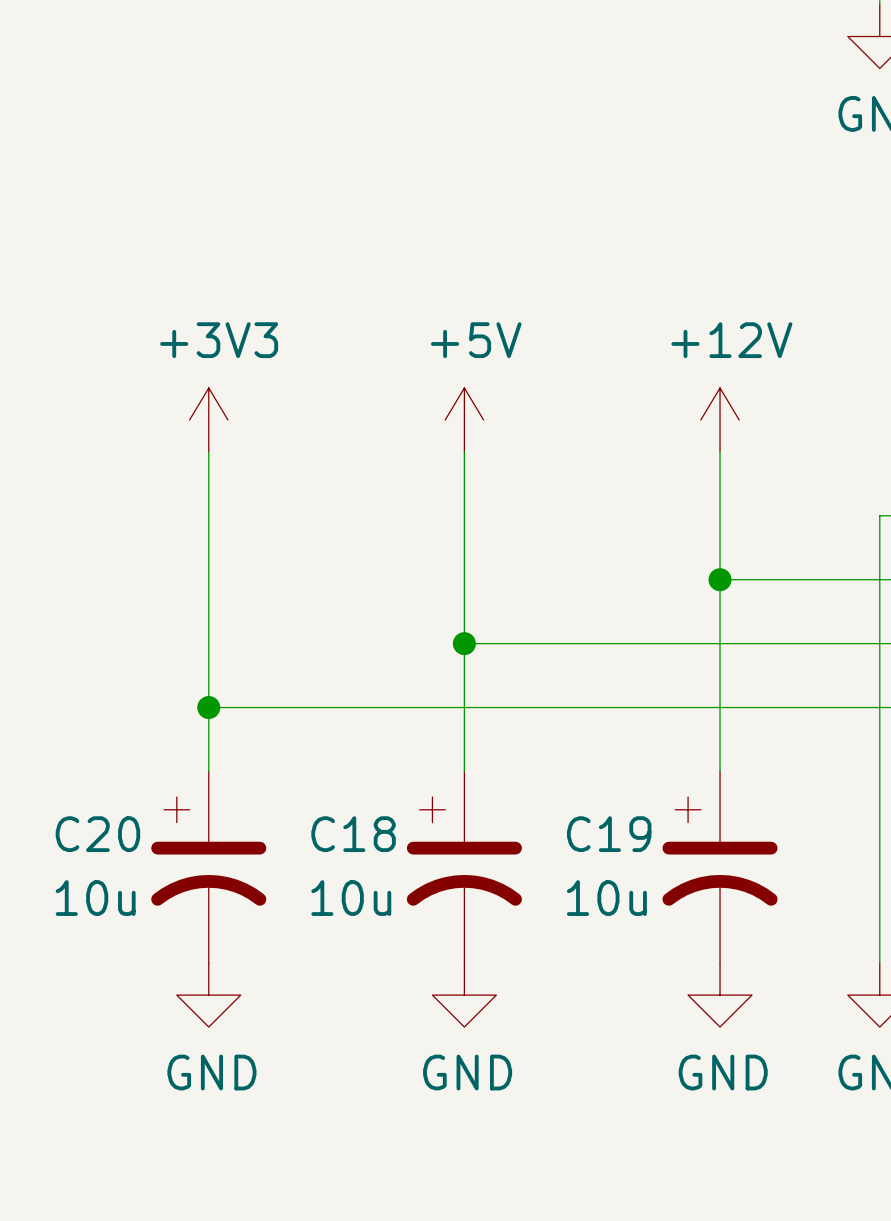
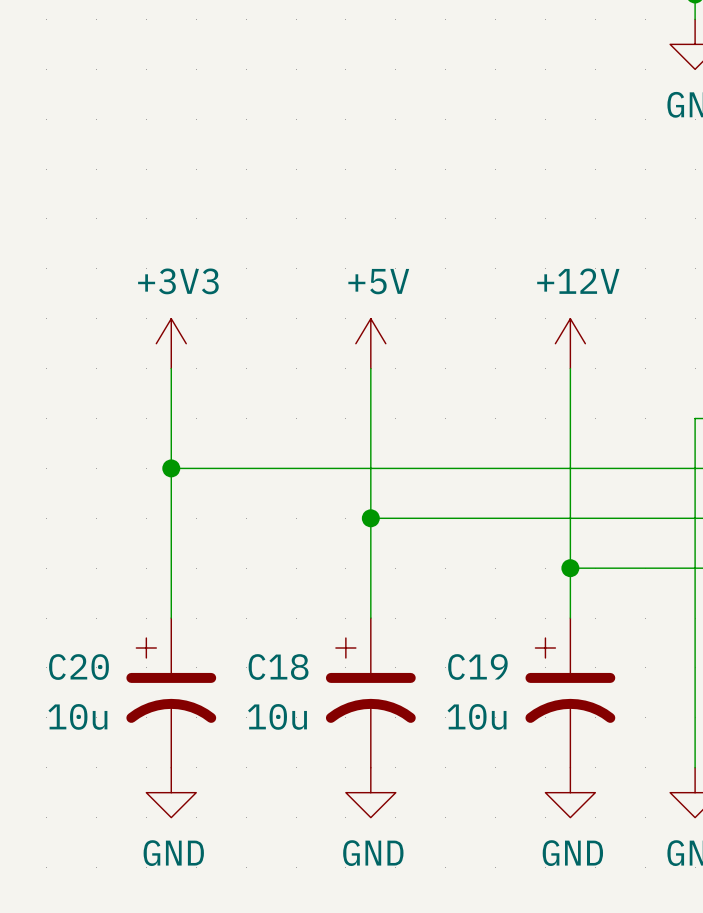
junction position: (720, 579) -> (570, 568)
wire: (208, 707) (720, 707) -> (171, 468) (570, 468)
junction position: (208, 707) -> (171, 468)

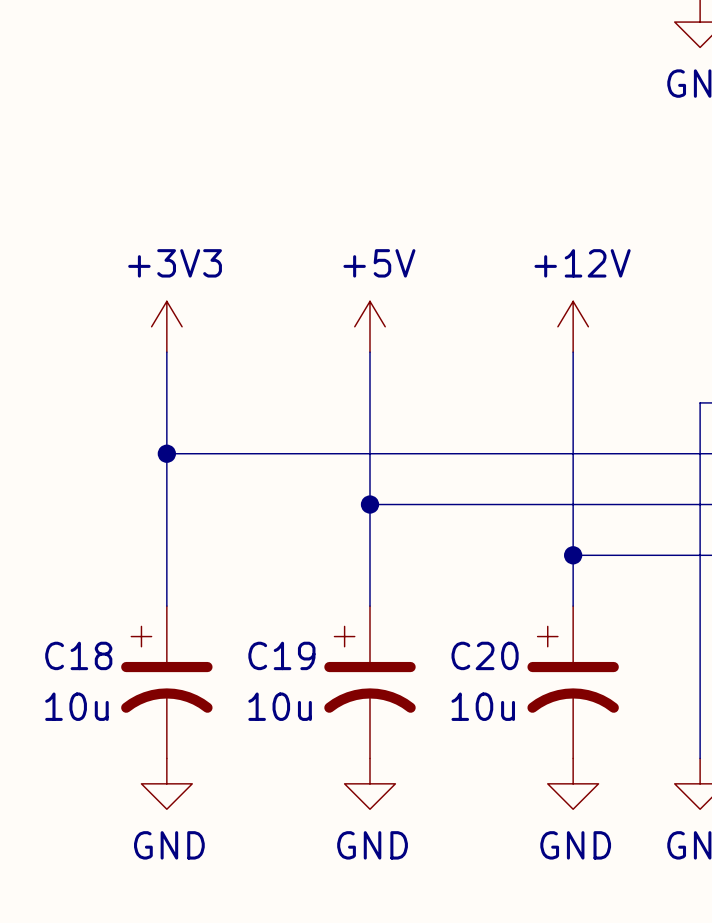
C20 name: C20 (78, 667) -> C18 (78, 655)
C18 name: C18 (278, 667) -> C19 (281, 655)
C19 name: C19 (477, 667) -> C20 (485, 655)

